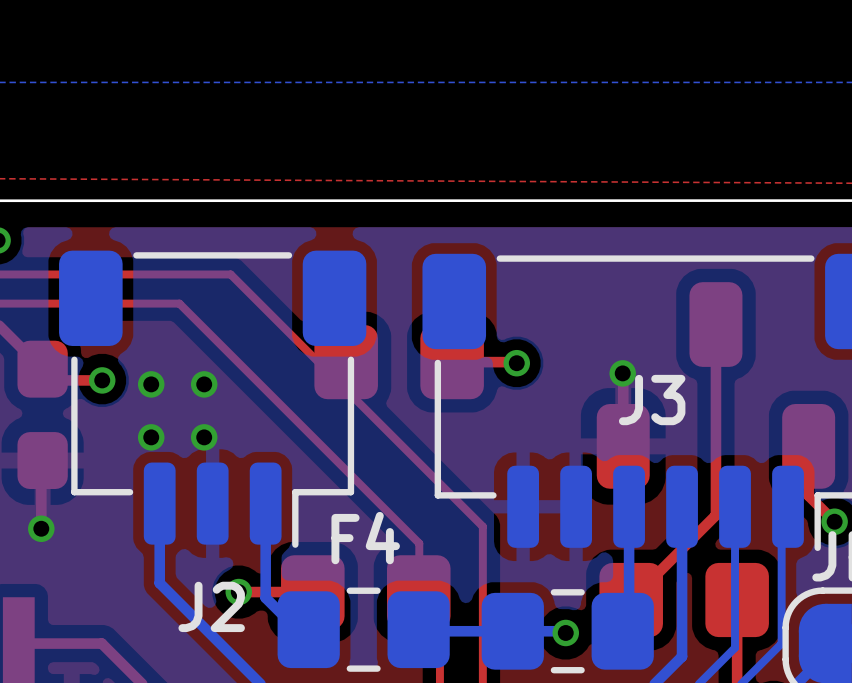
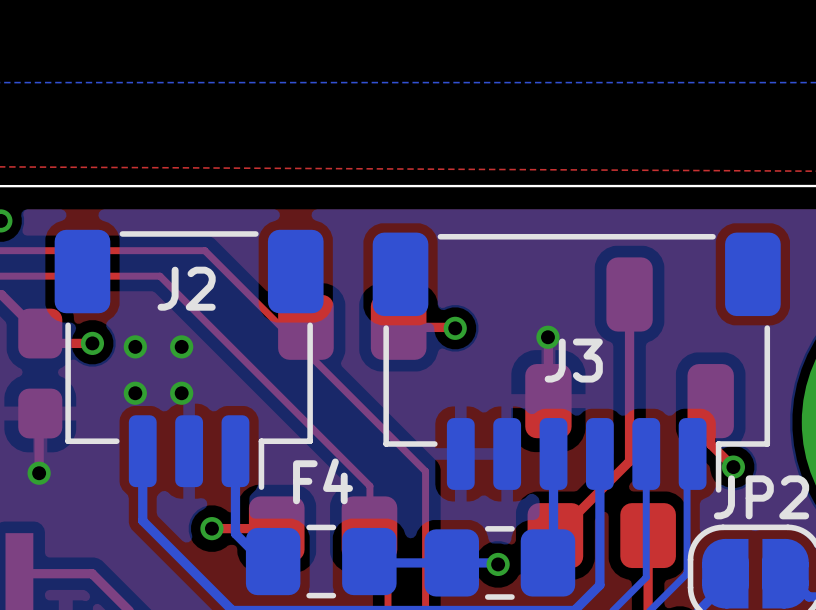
J2 name position: J2 (211, 606) -> J2 (186, 288)

